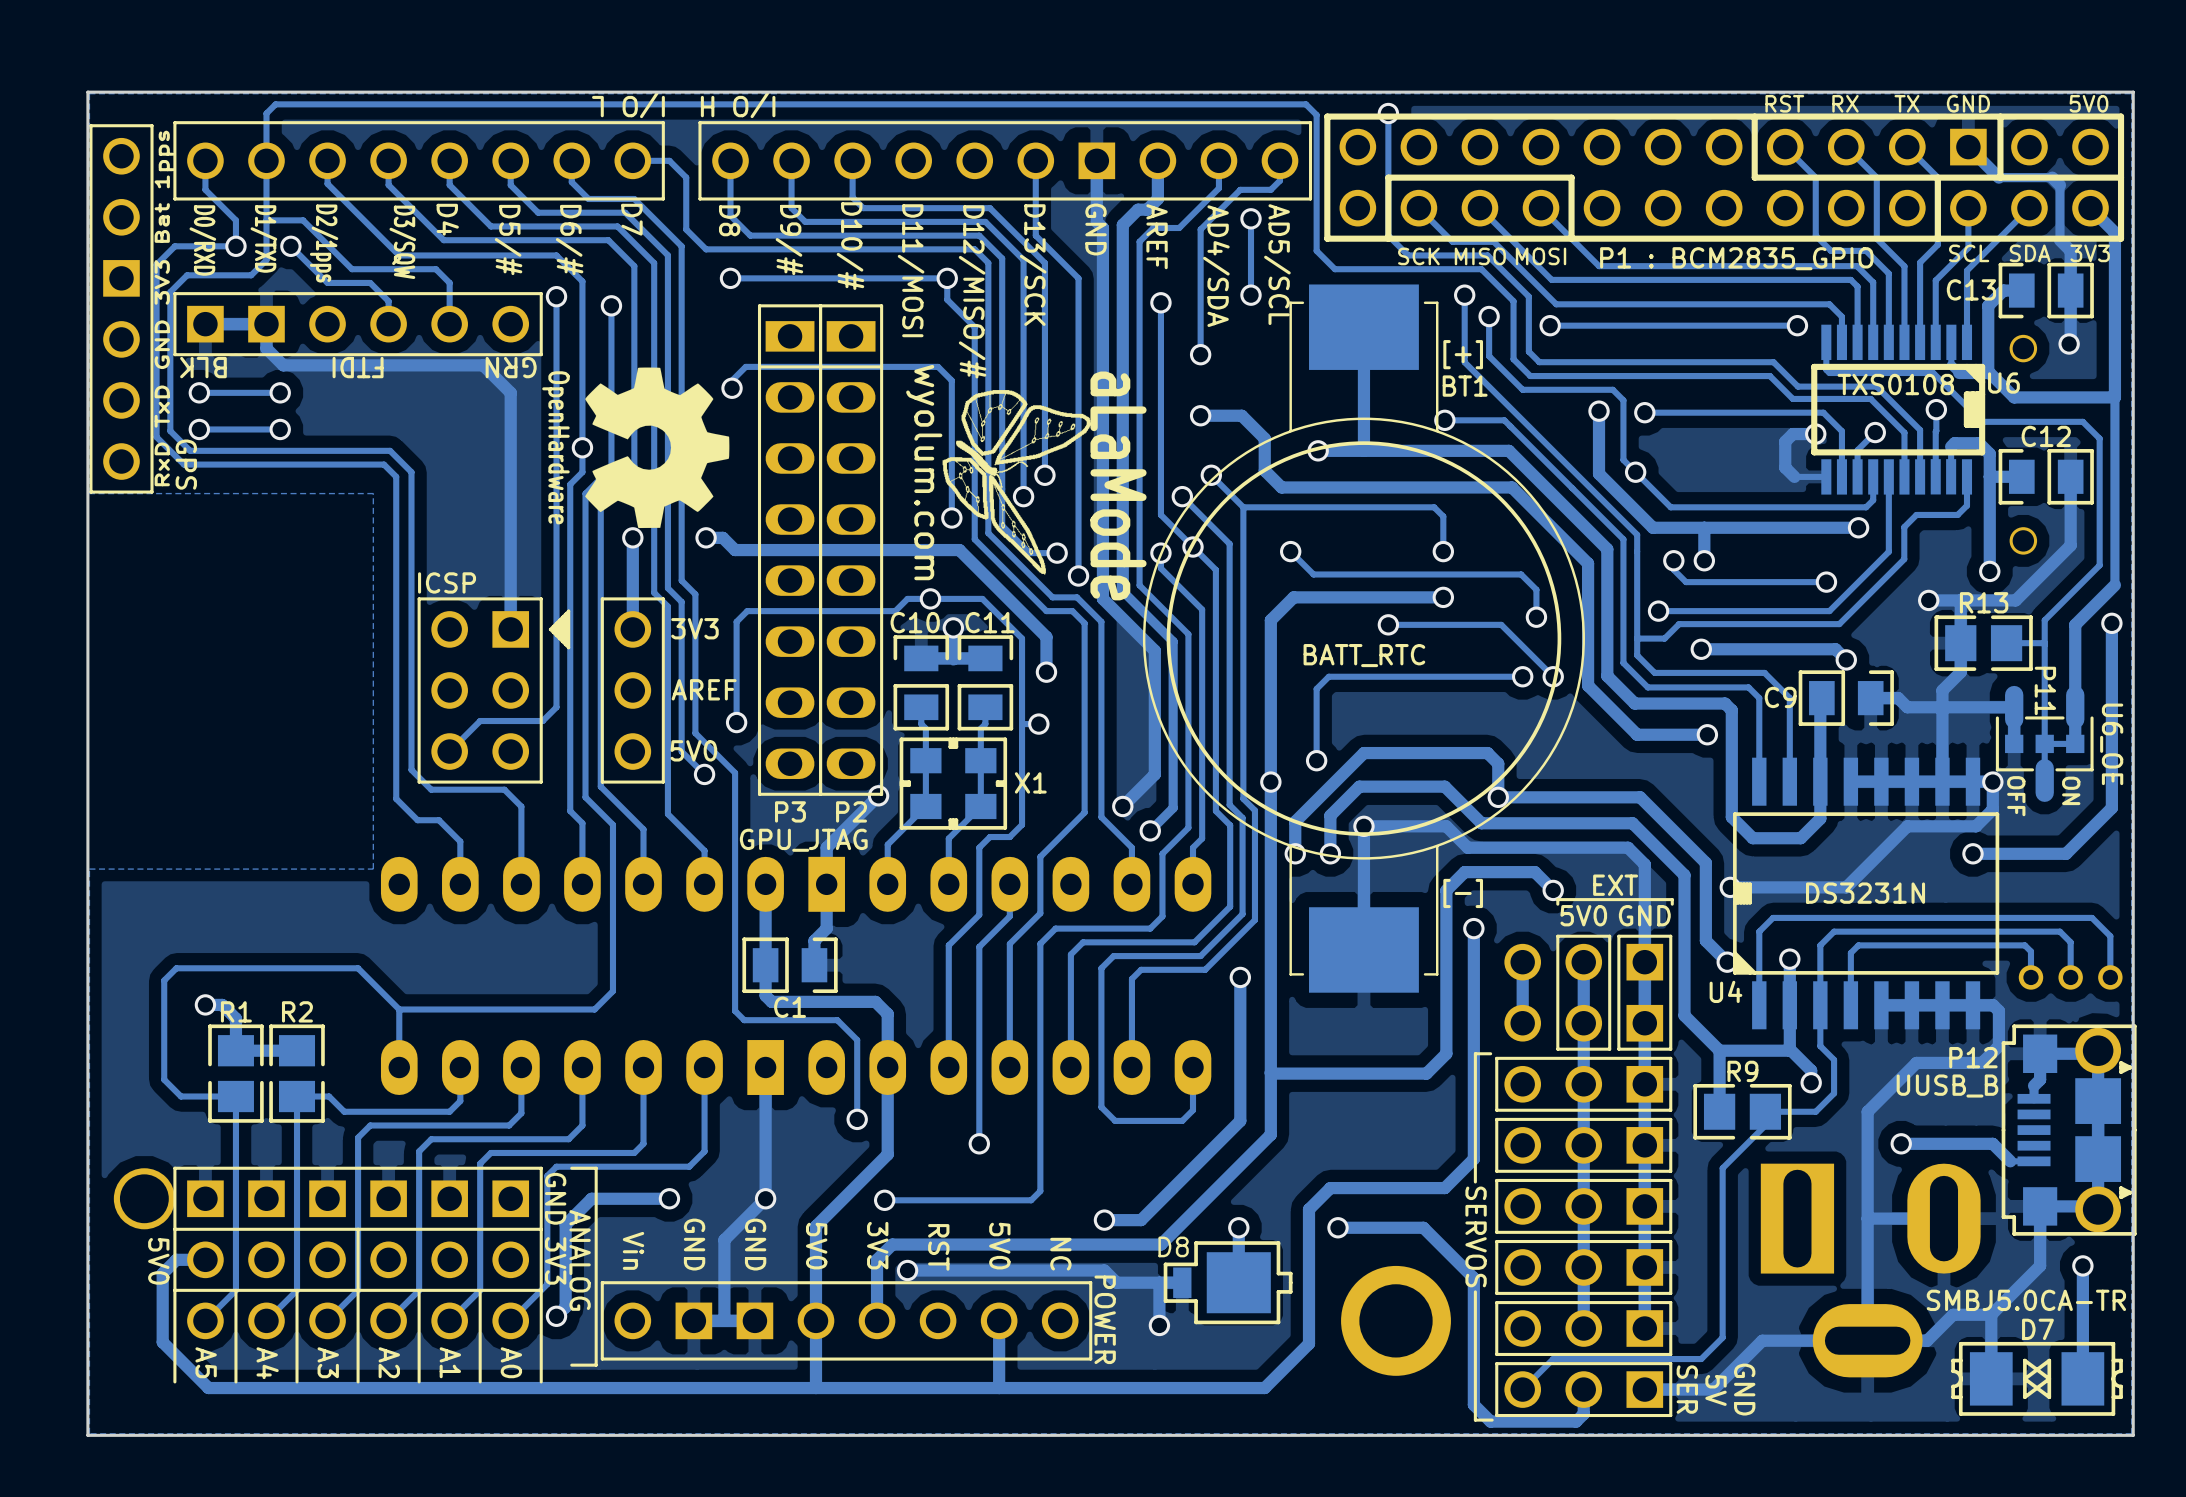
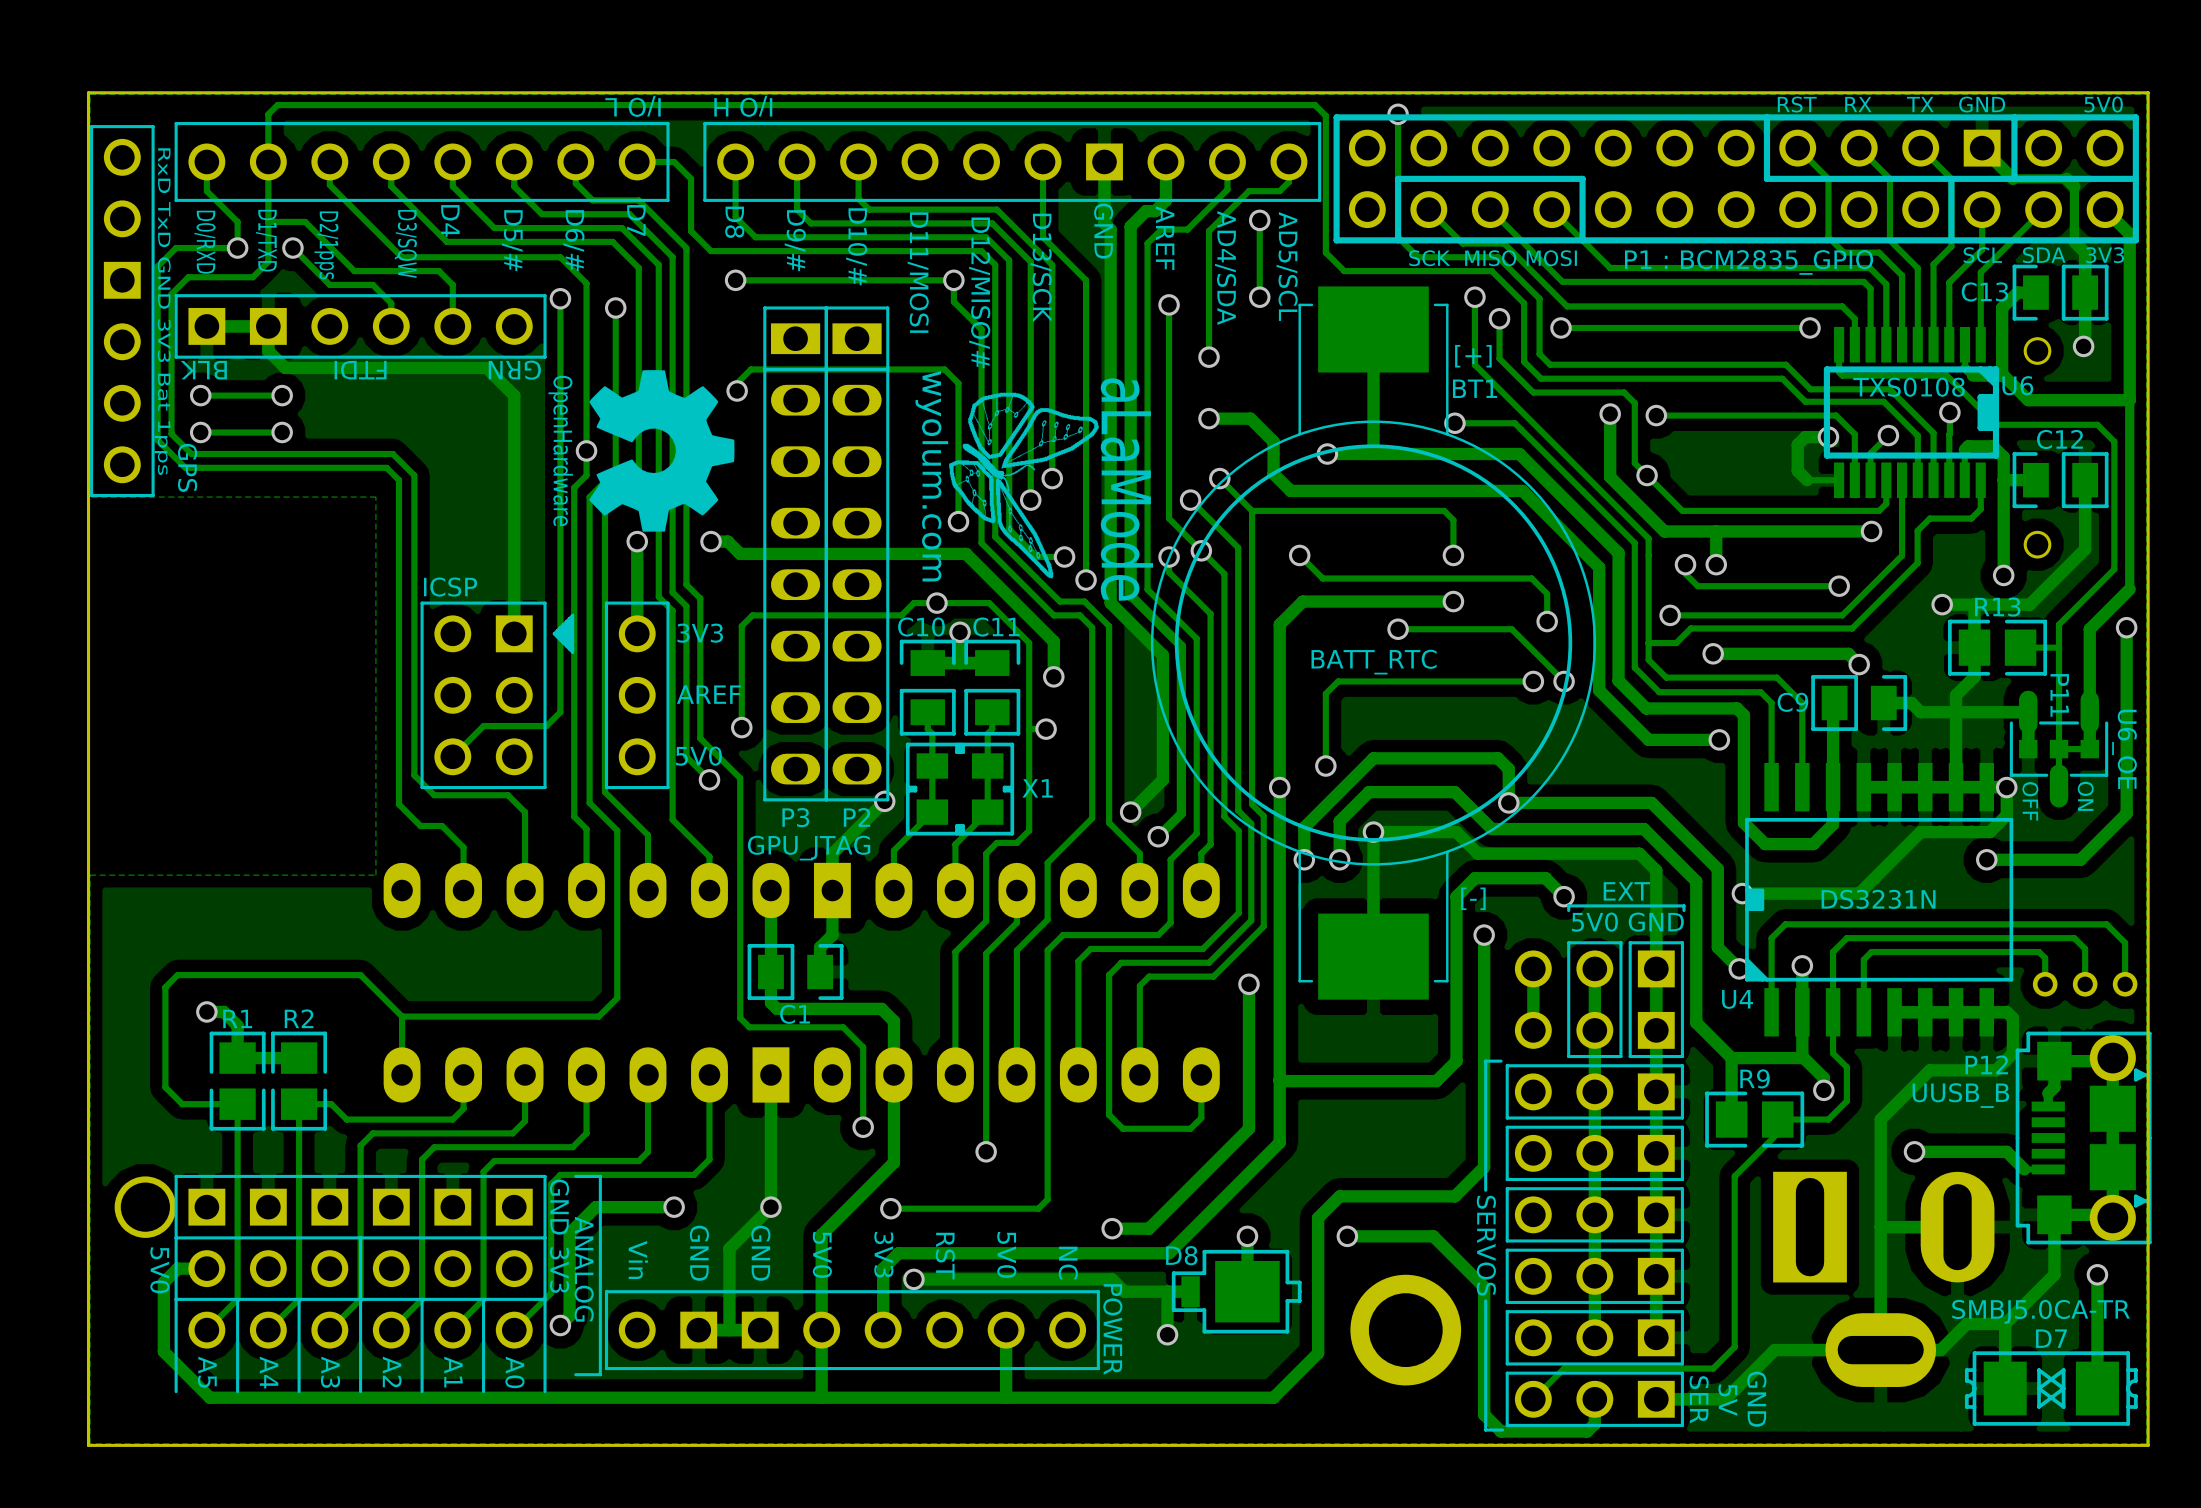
text rotation: 0° (164, 308) -> 180° (162, 311)

